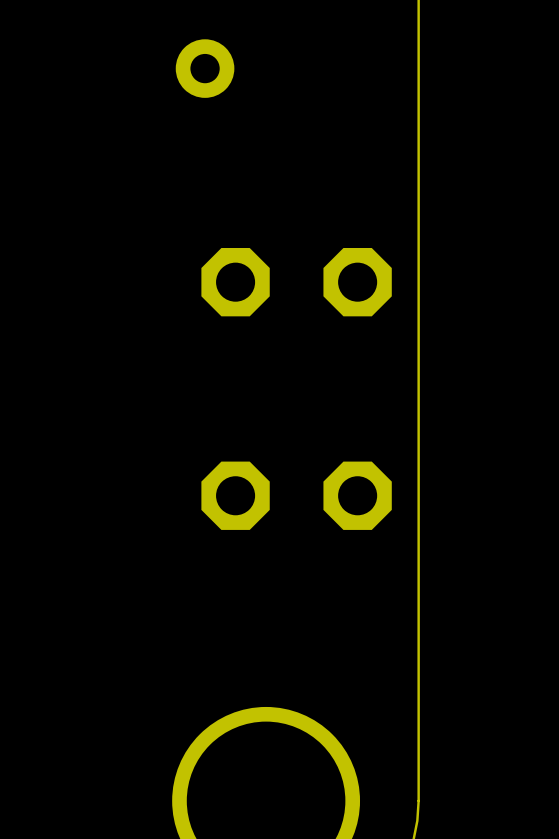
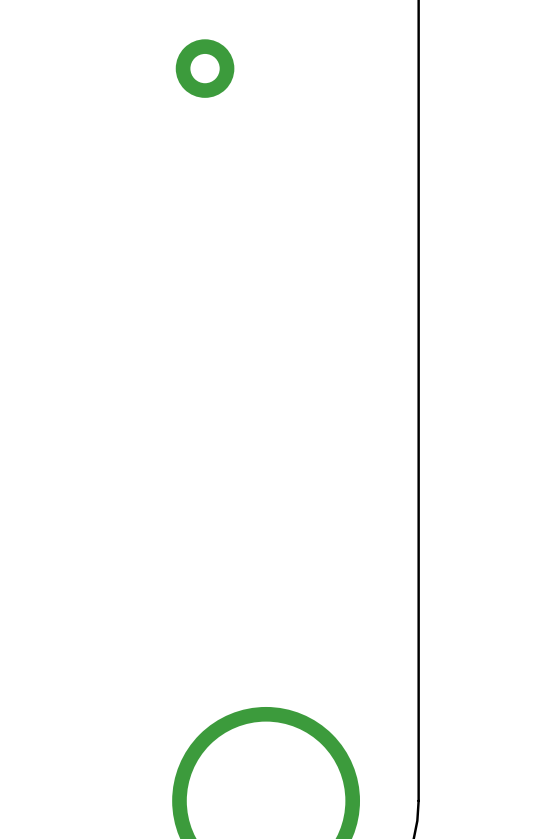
part: (296, 282) -> none
part: (296, 495) -> none

